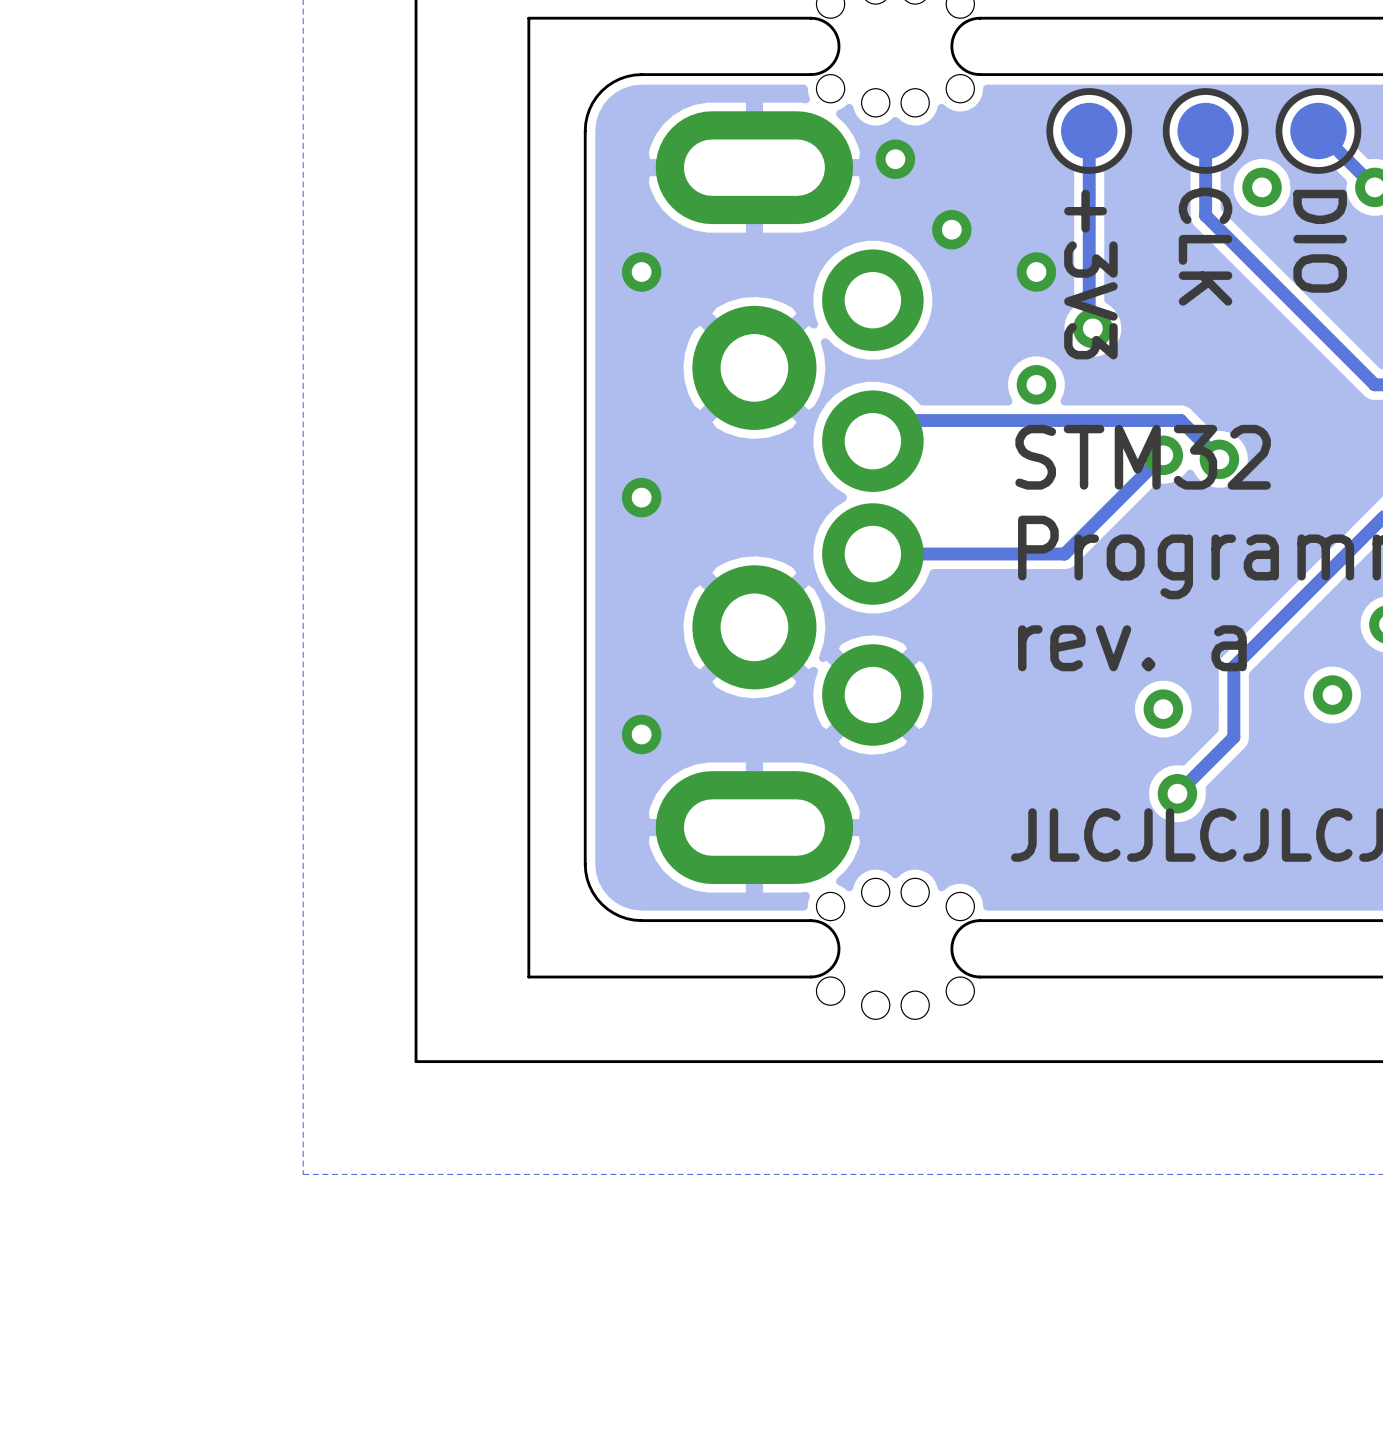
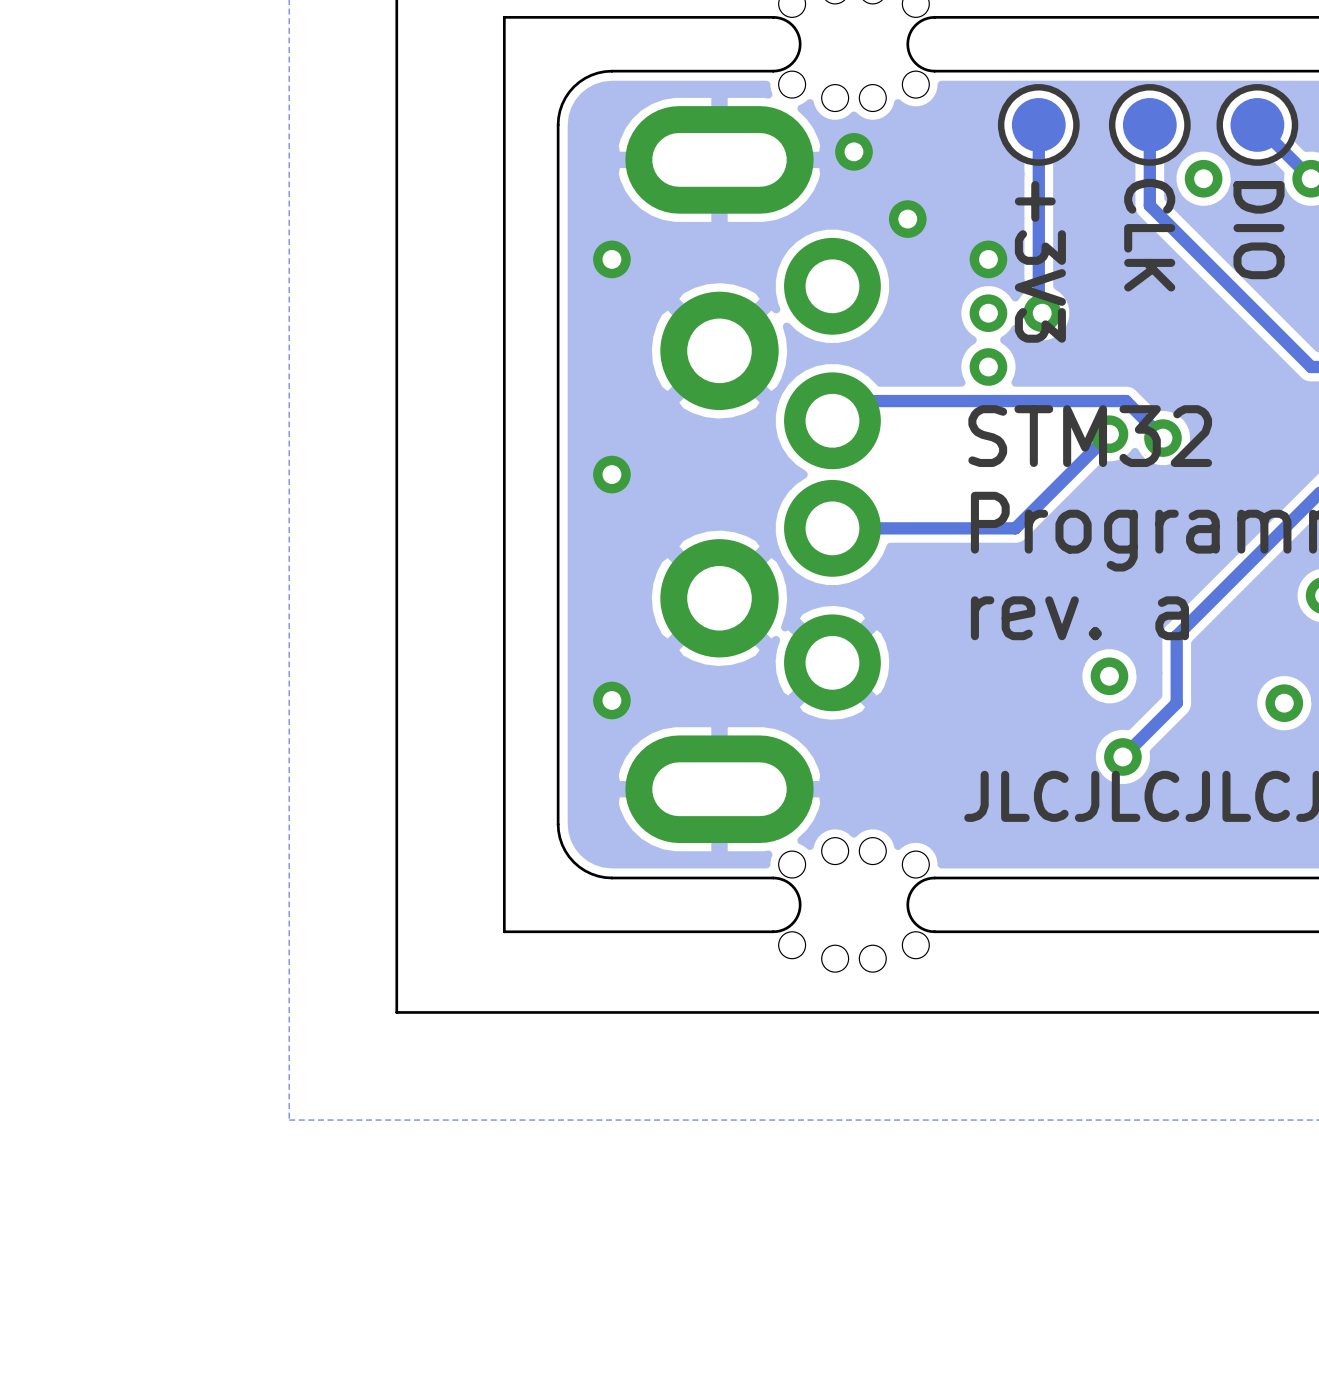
via: none -> (988, 313)
via position: (1332, 695) -> (1284, 703)

